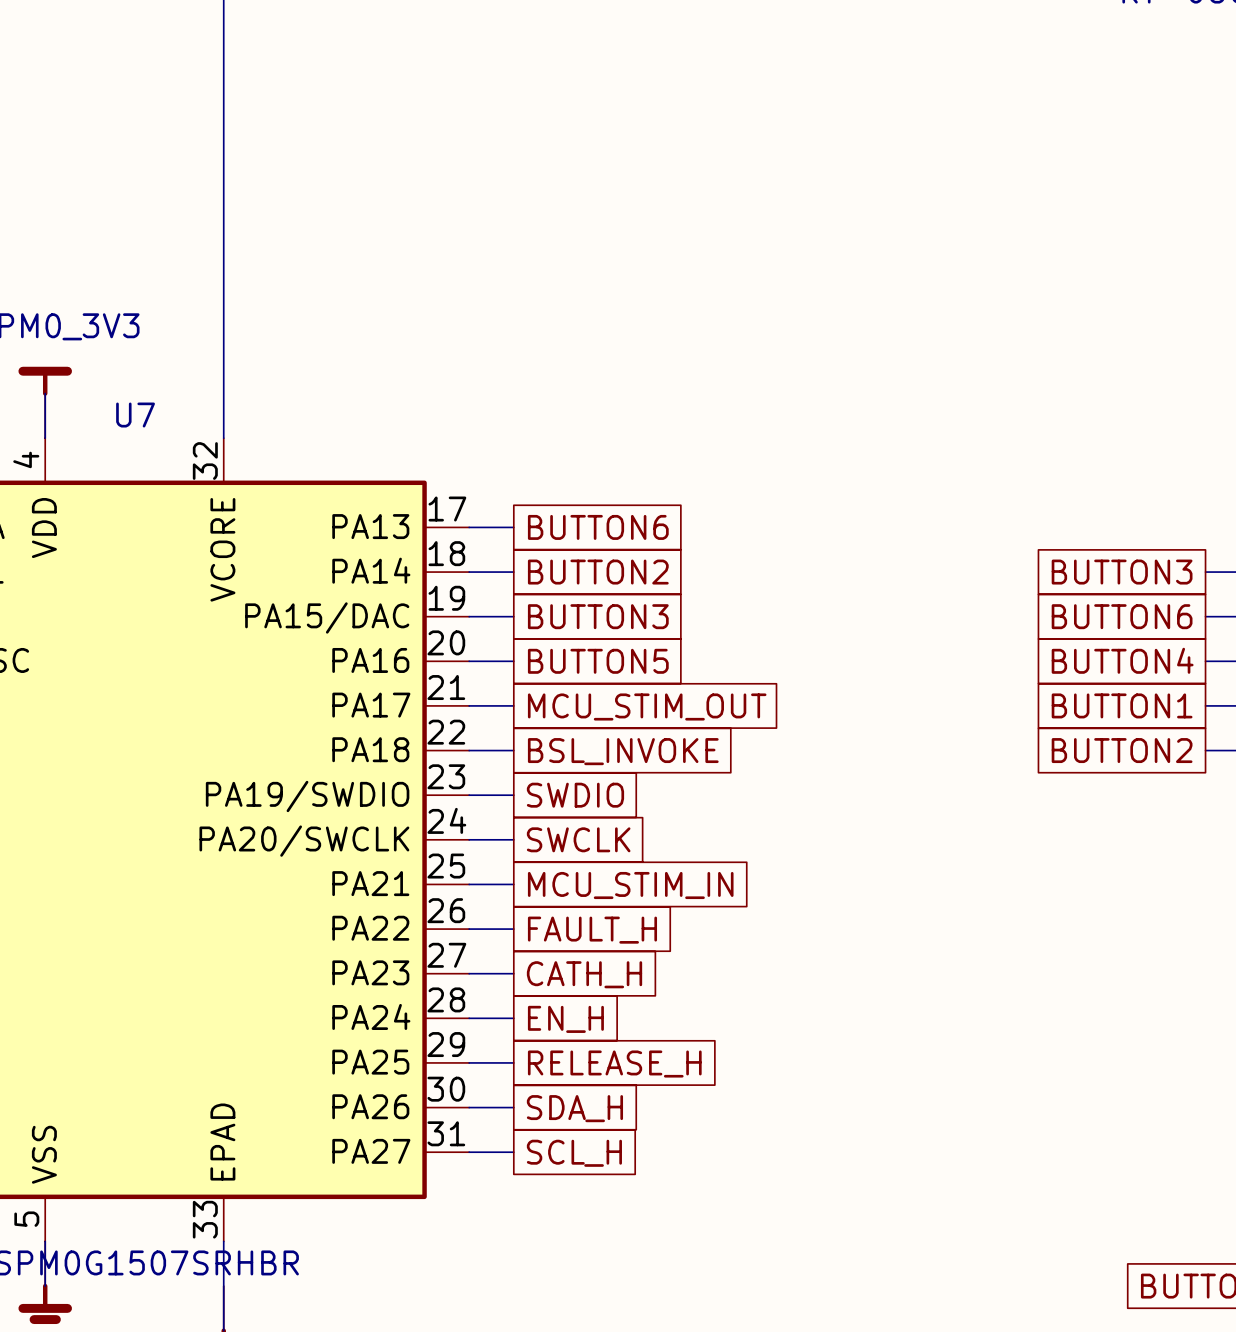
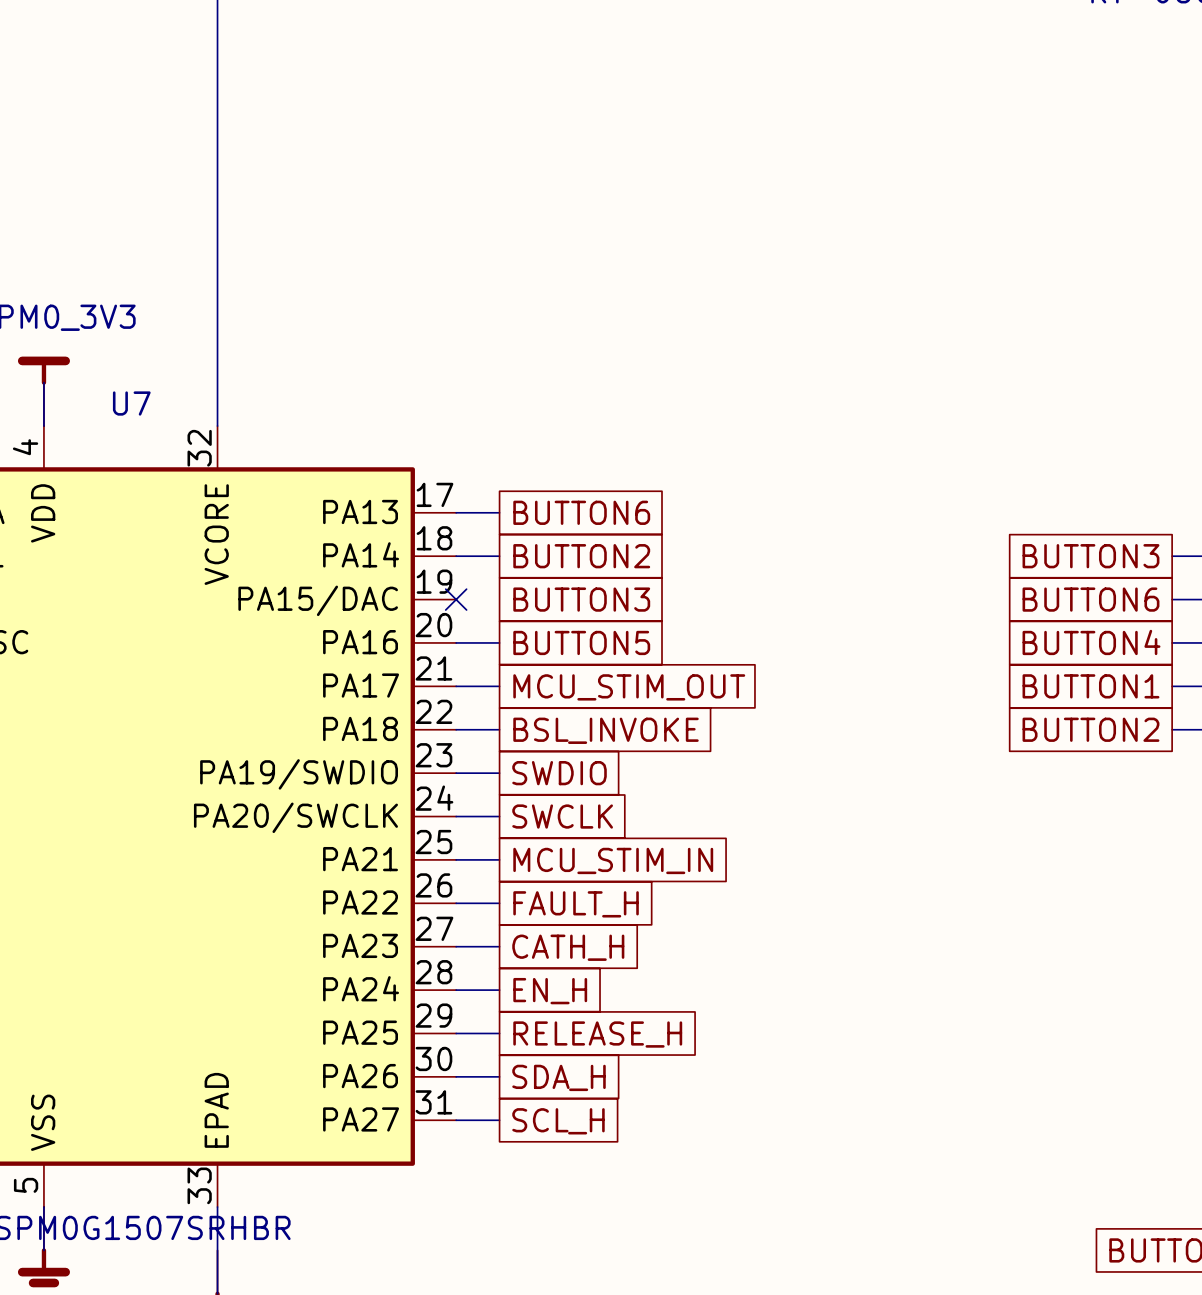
wire: (469, 616) (513, 616) -> none
no-connect mark: none -> (456, 599)

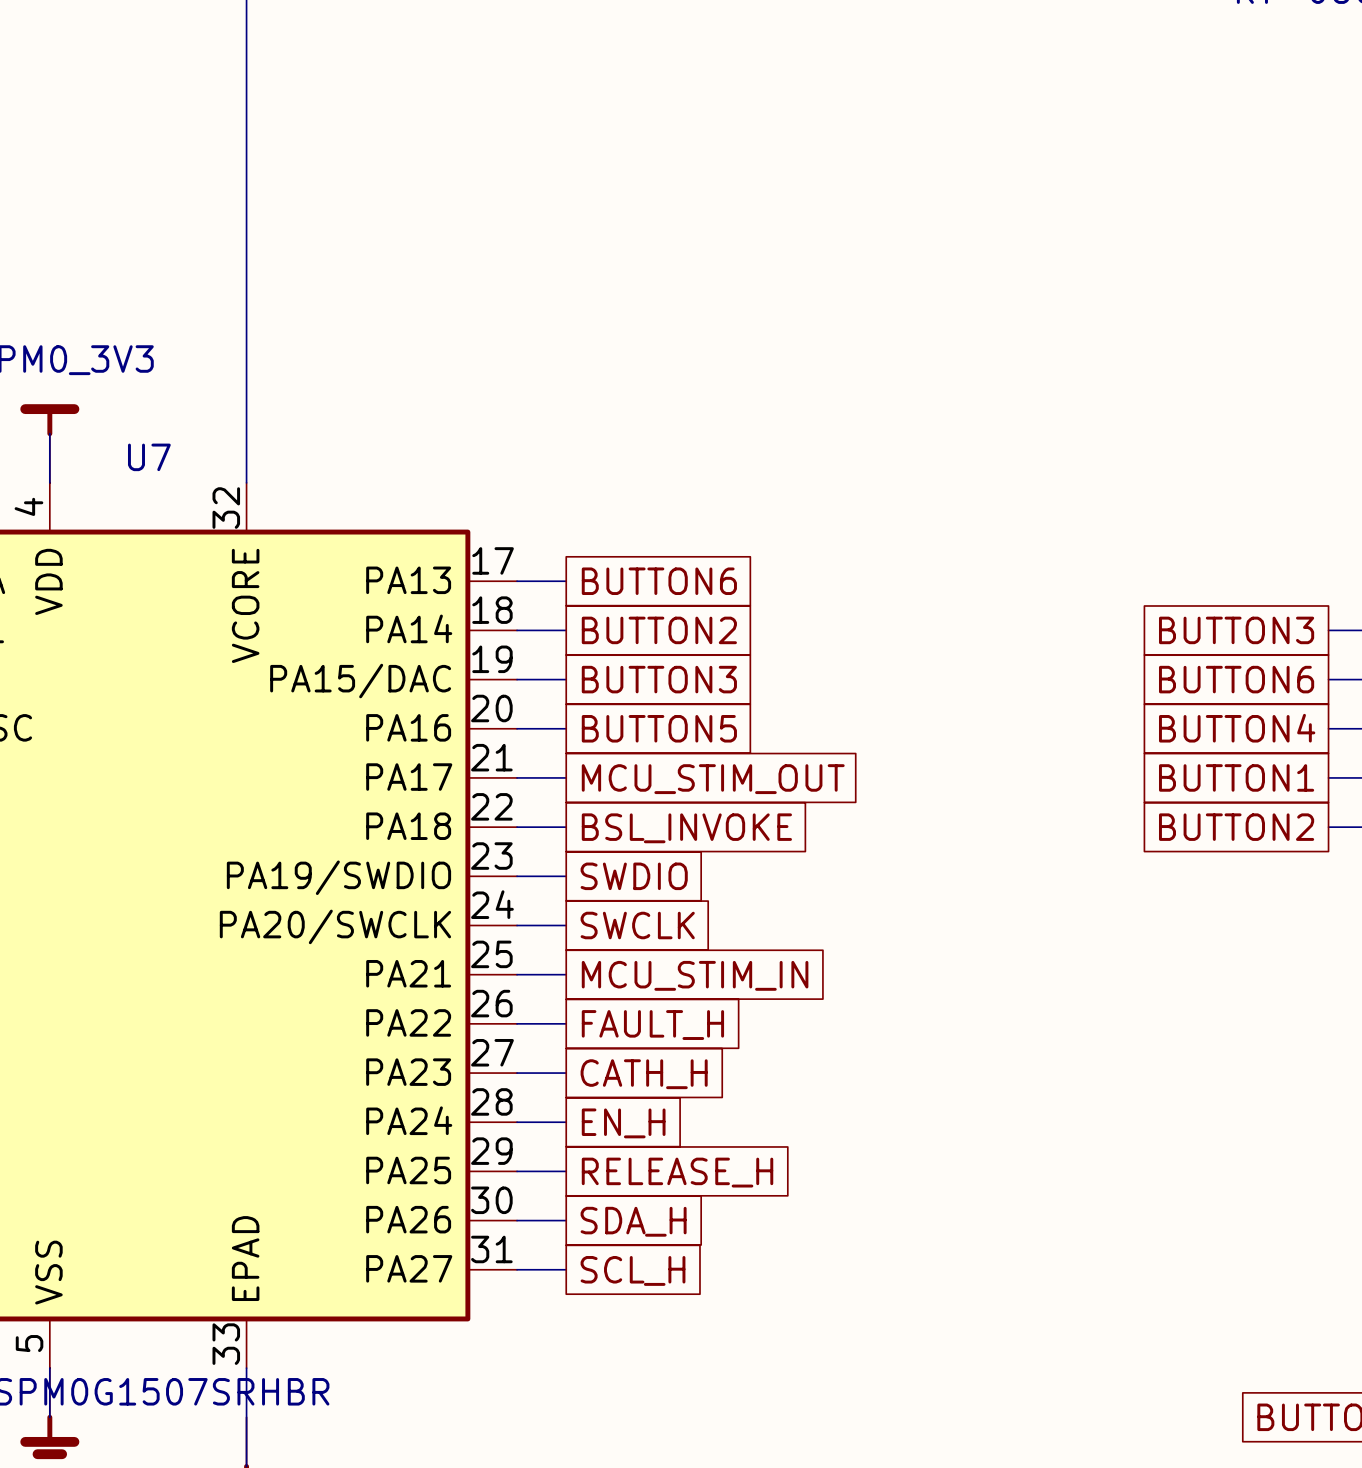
wire: none -> (517, 679) (566, 679)
no-connect mark: (456, 599) -> none

